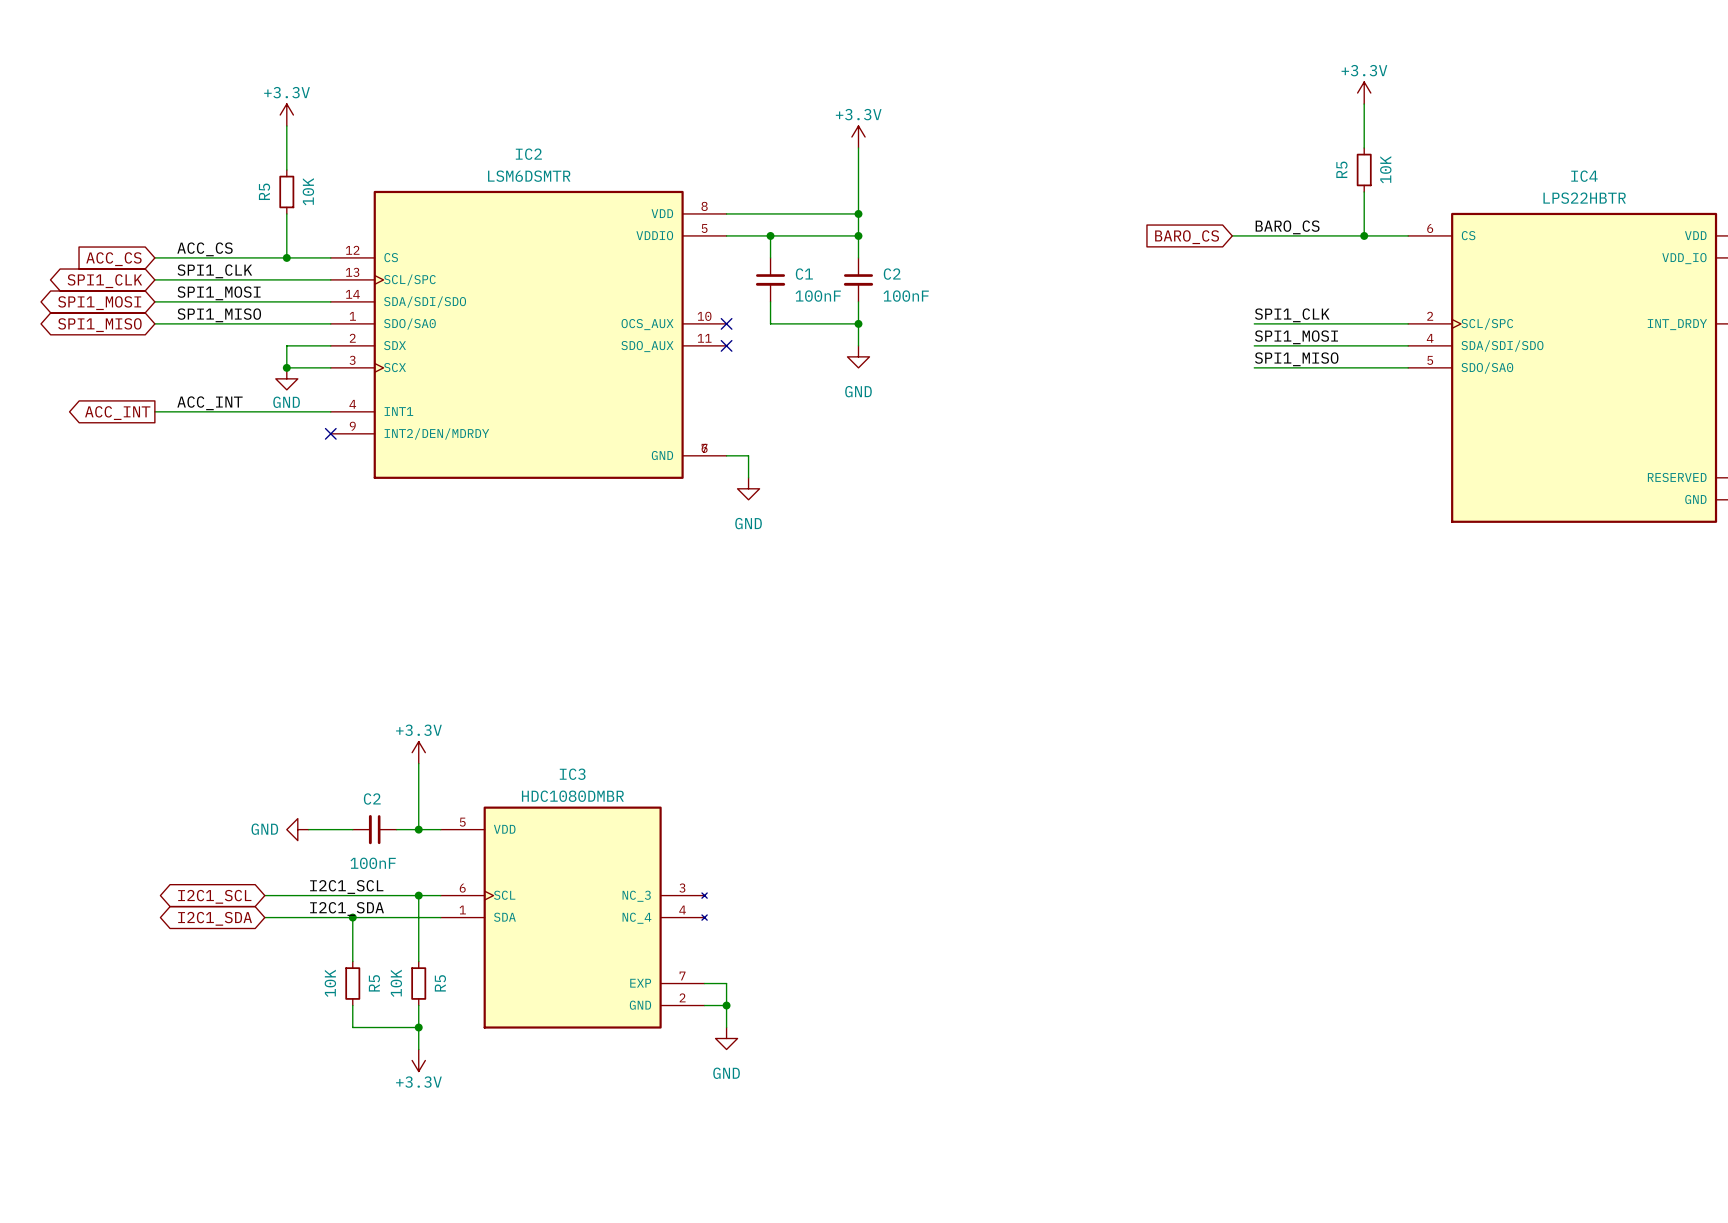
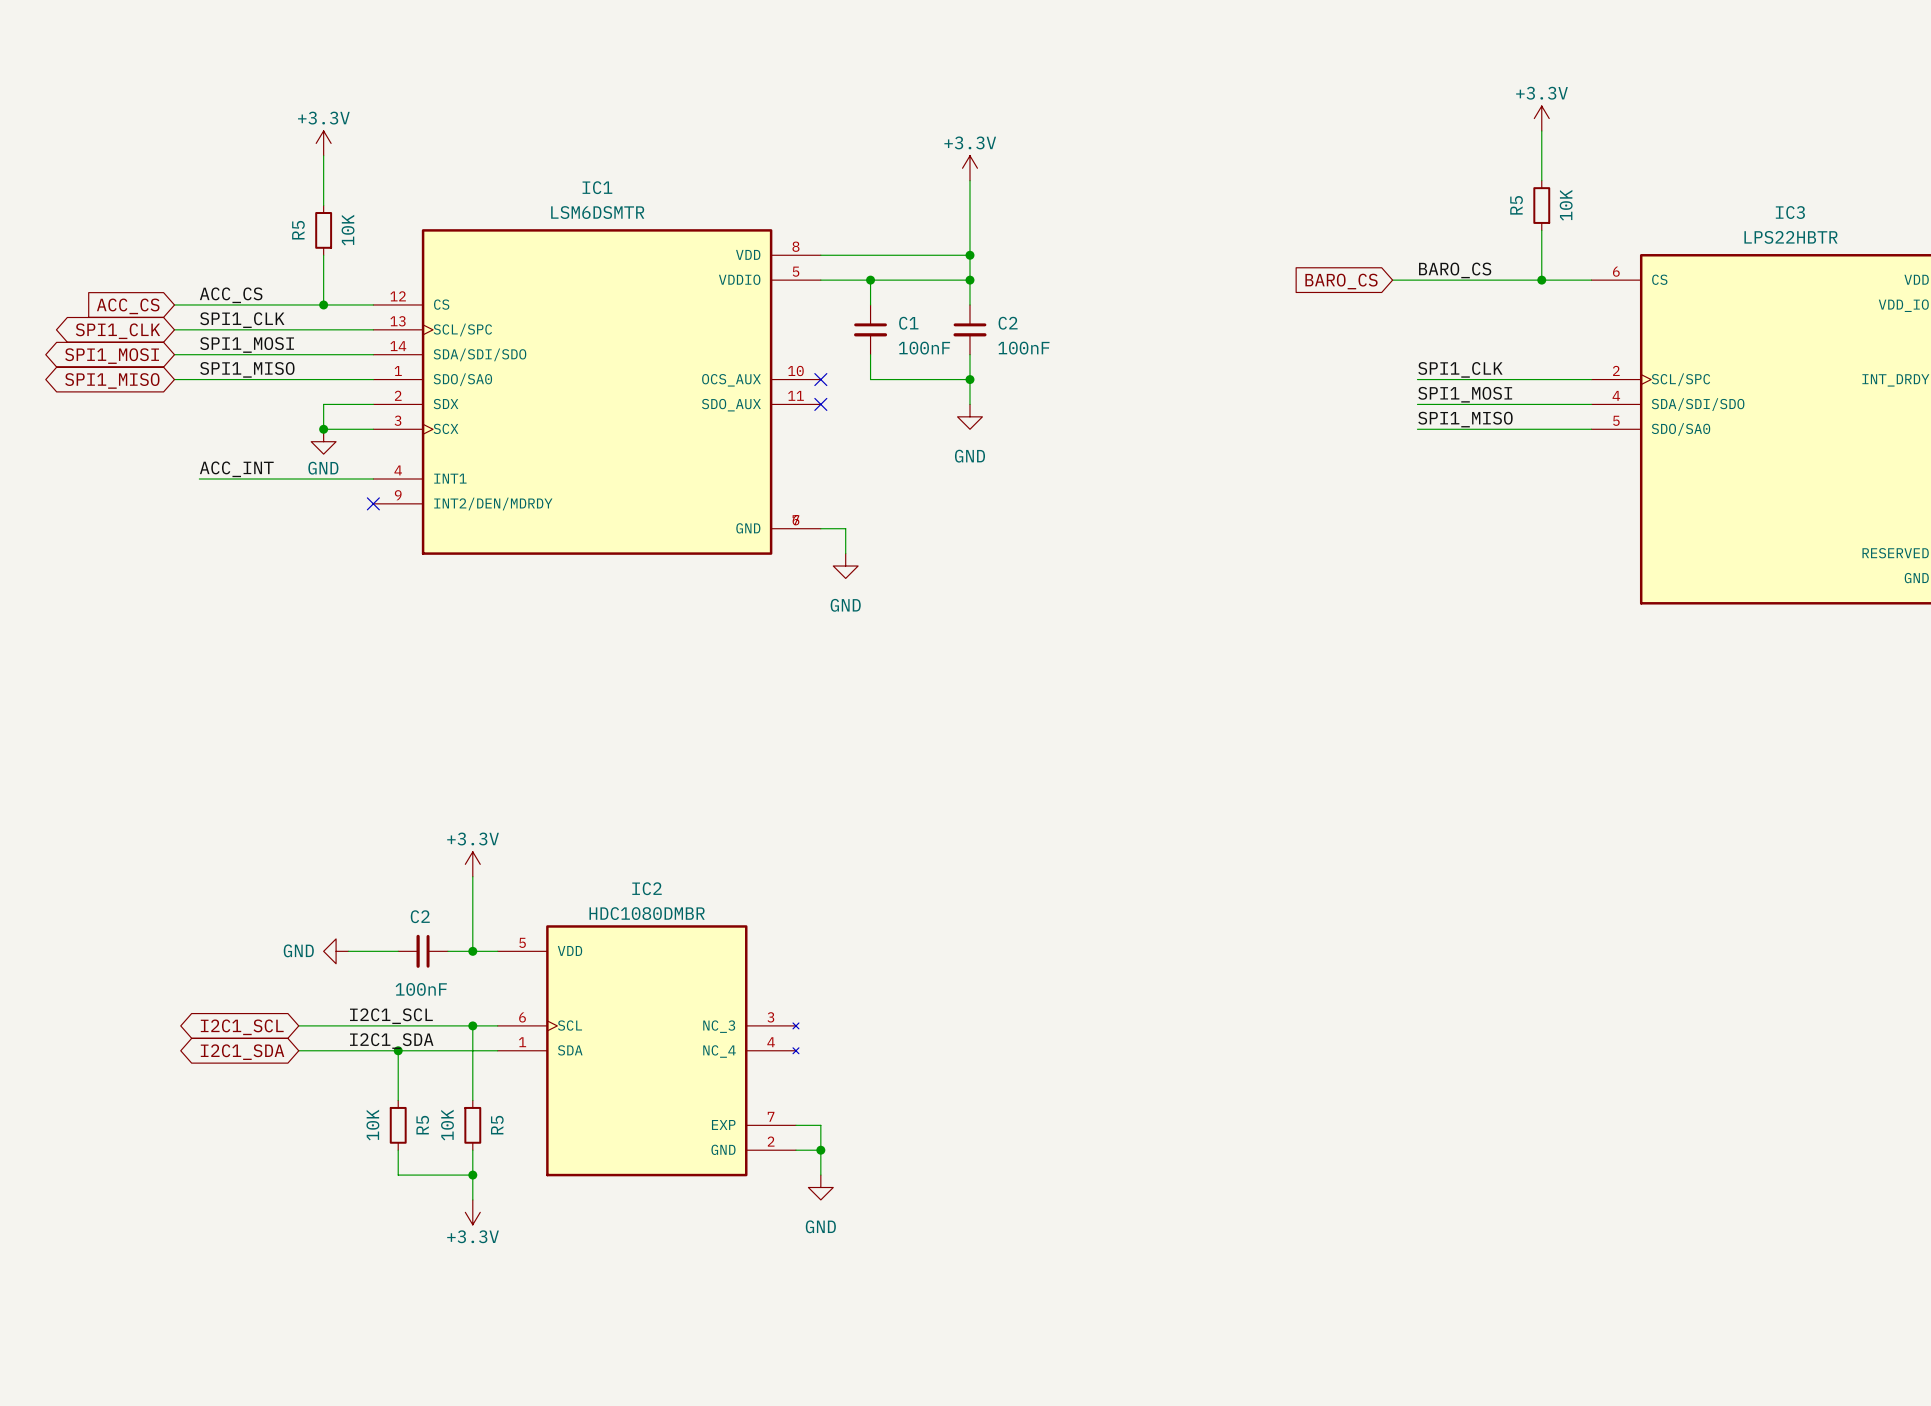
IC2 name: IC2 (528, 154) -> IC1 (597, 187)
IC4 name: IC4 (1584, 176) -> IC3 (1790, 212)
wire: (154, 411) (176, 411) -> none
global label: ACC_INT (117, 413) -> none
IC3 name: IC3 (572, 774) -> IC2 (647, 888)

